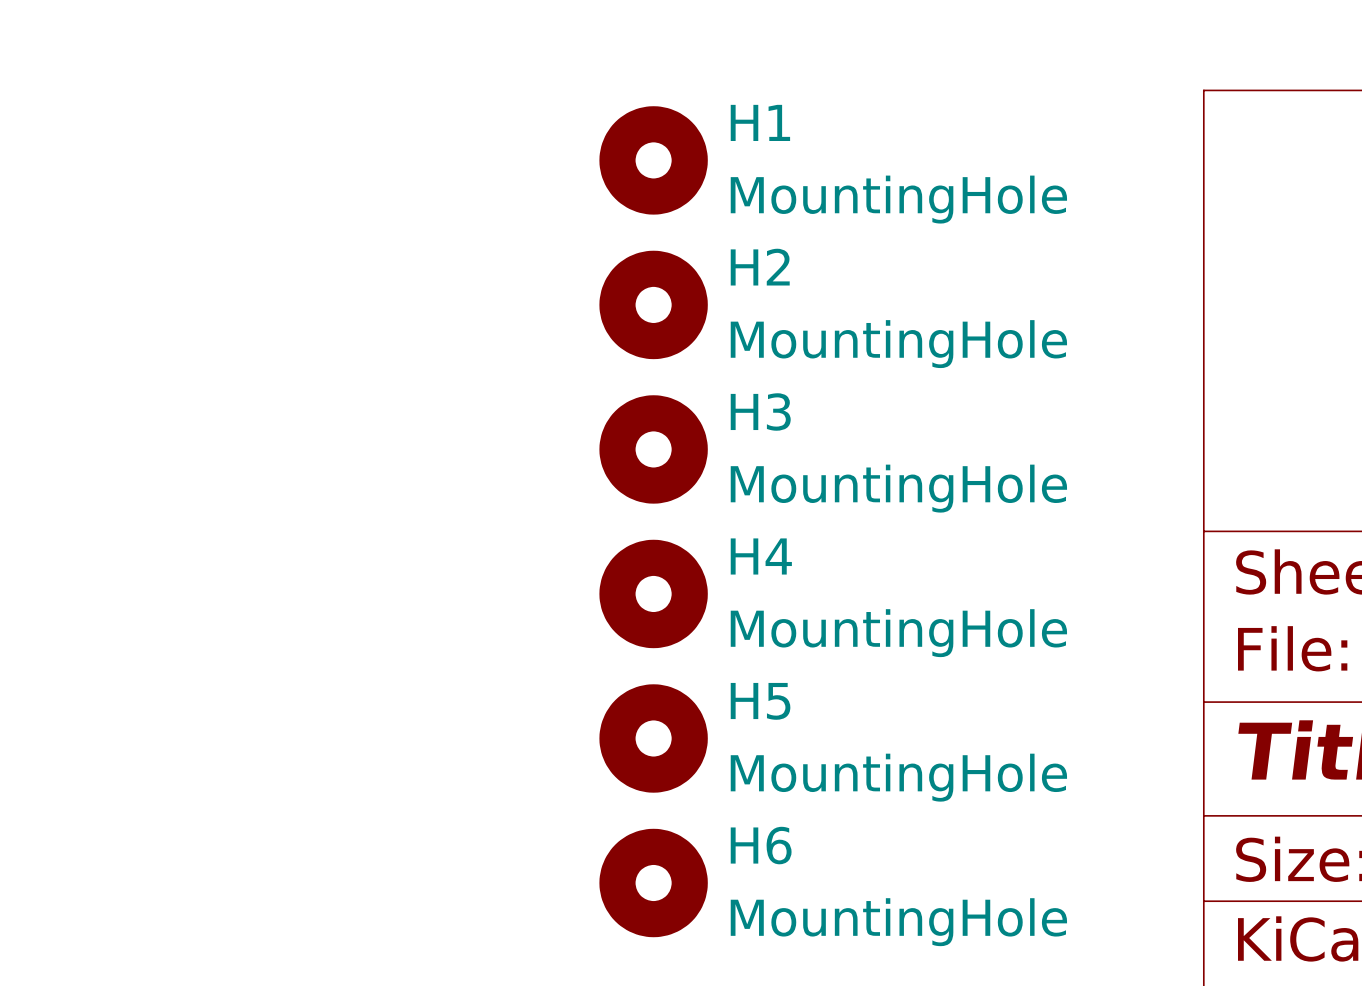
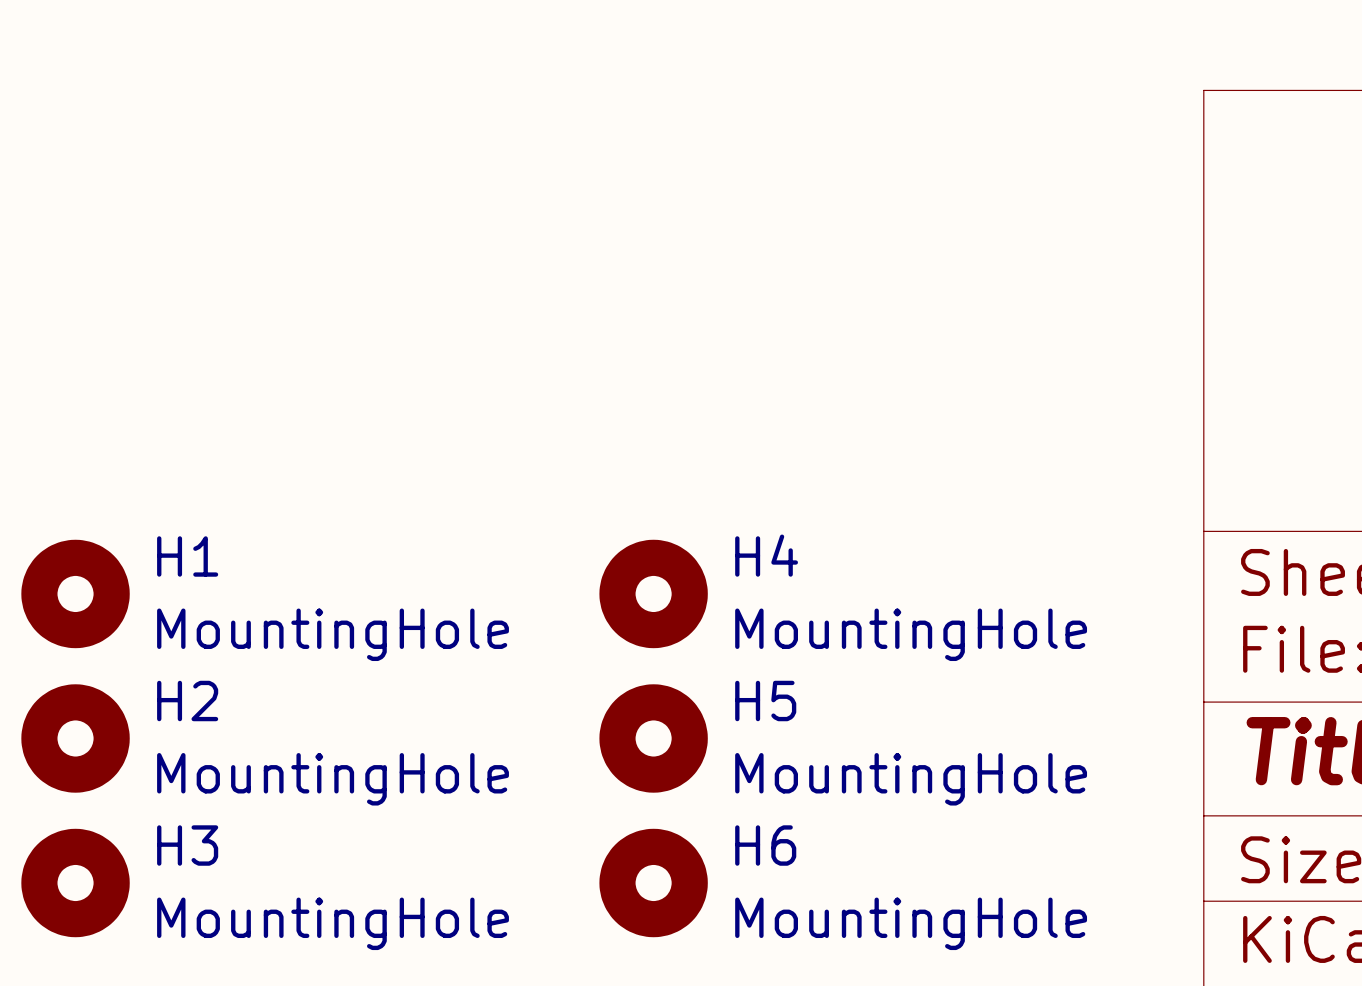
H1 position: (653, 160) -> (75, 593)
H2 position: (653, 304) -> (75, 738)
H3 position: (653, 449) -> (75, 883)

